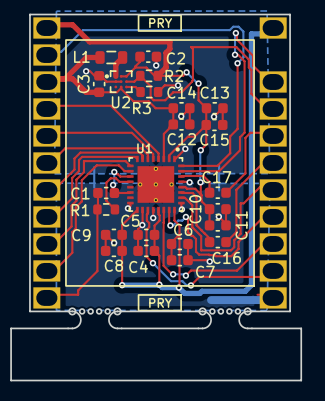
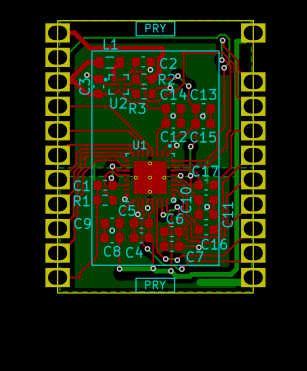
part footprint: [29, 14, 291, 329] -> [45, 20, 266, 294]
L1 name position: L1 (81, 56) -> L1 (110, 44)
board edge: (68, 328) (11, 328) (11, 380) (301, 380) (301, 328) (251, 328) -> none
board edge: (121, 328) (198, 328) -> none

